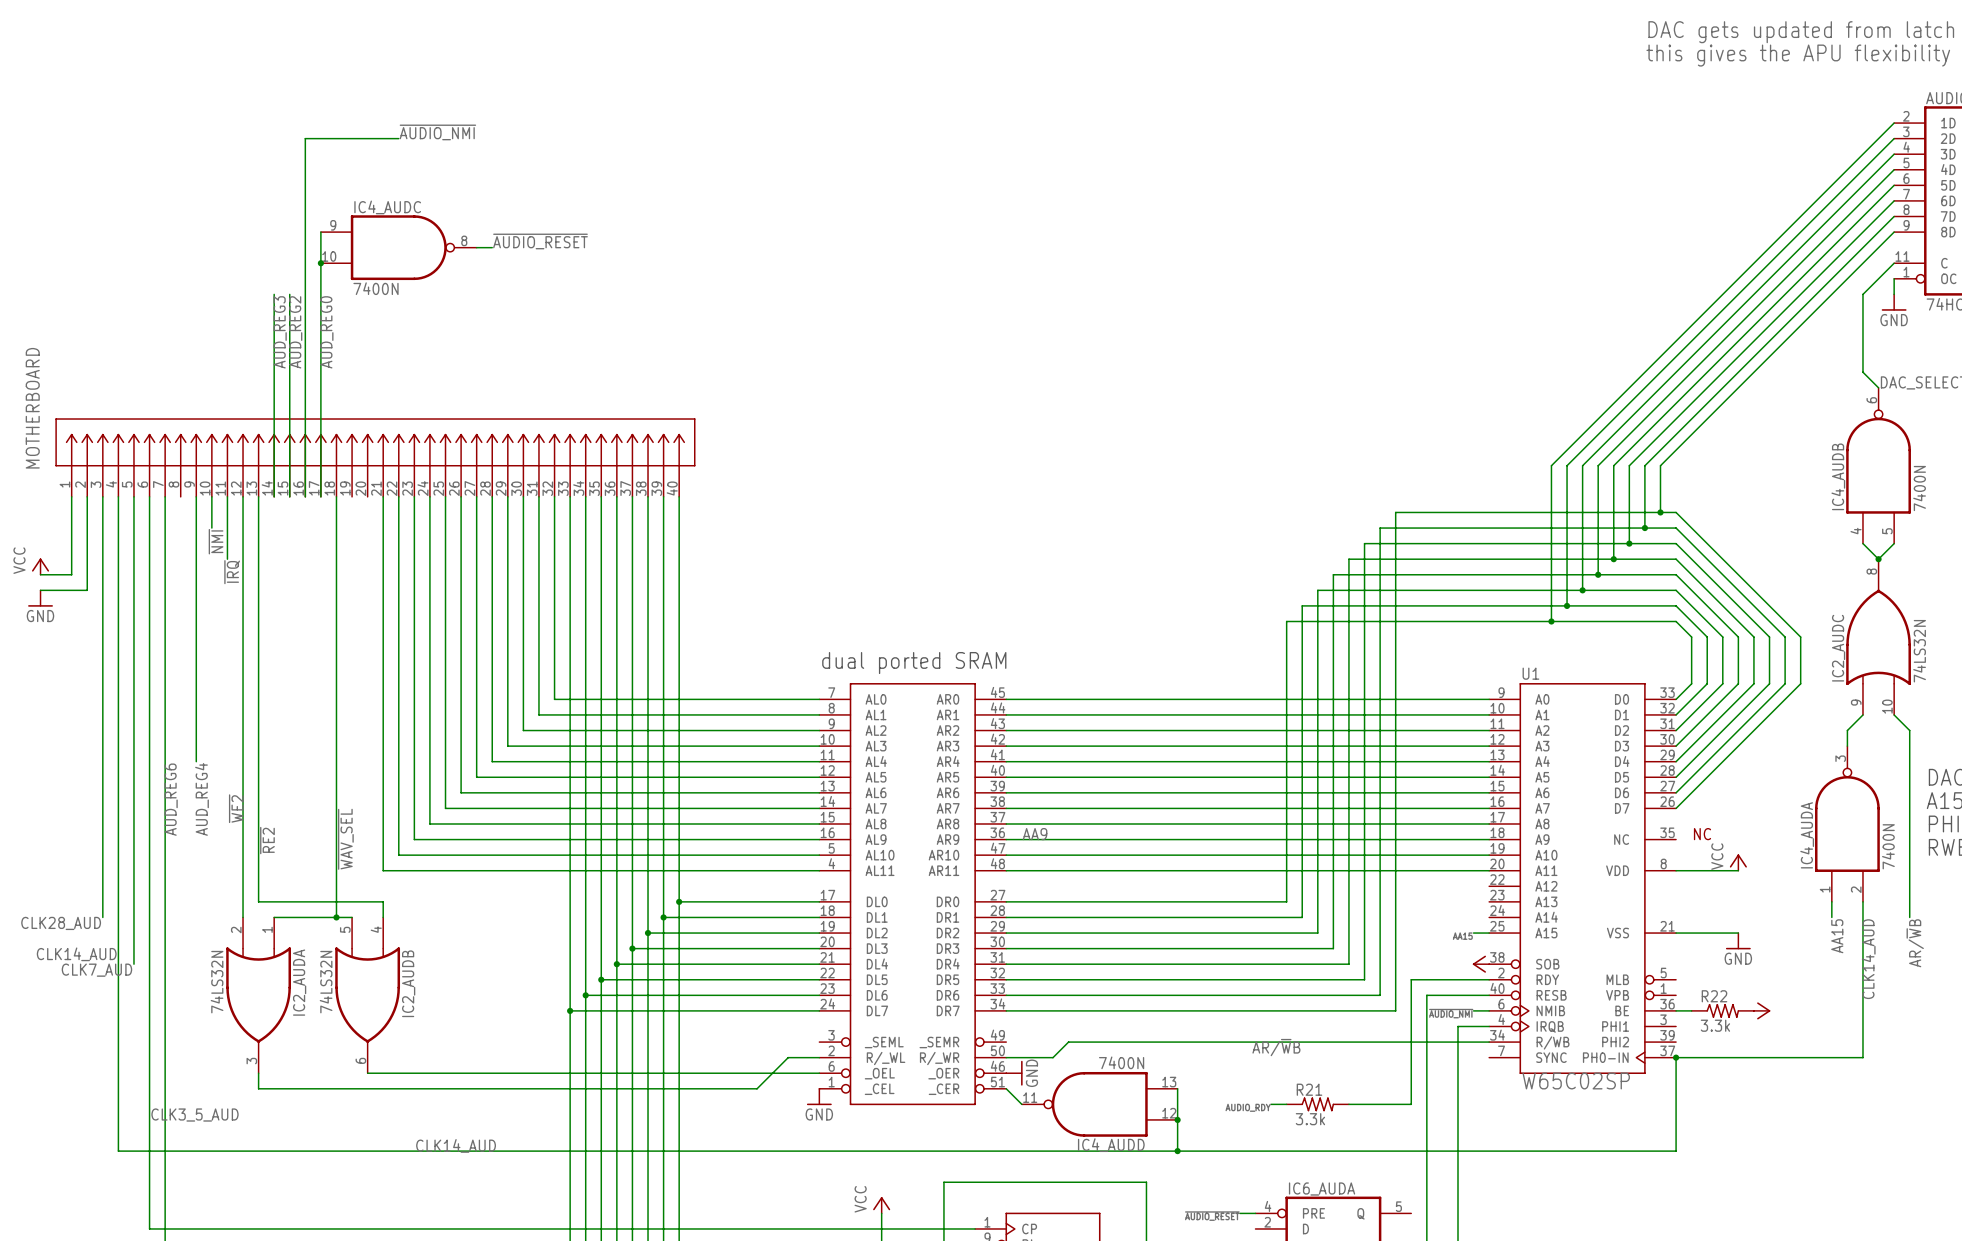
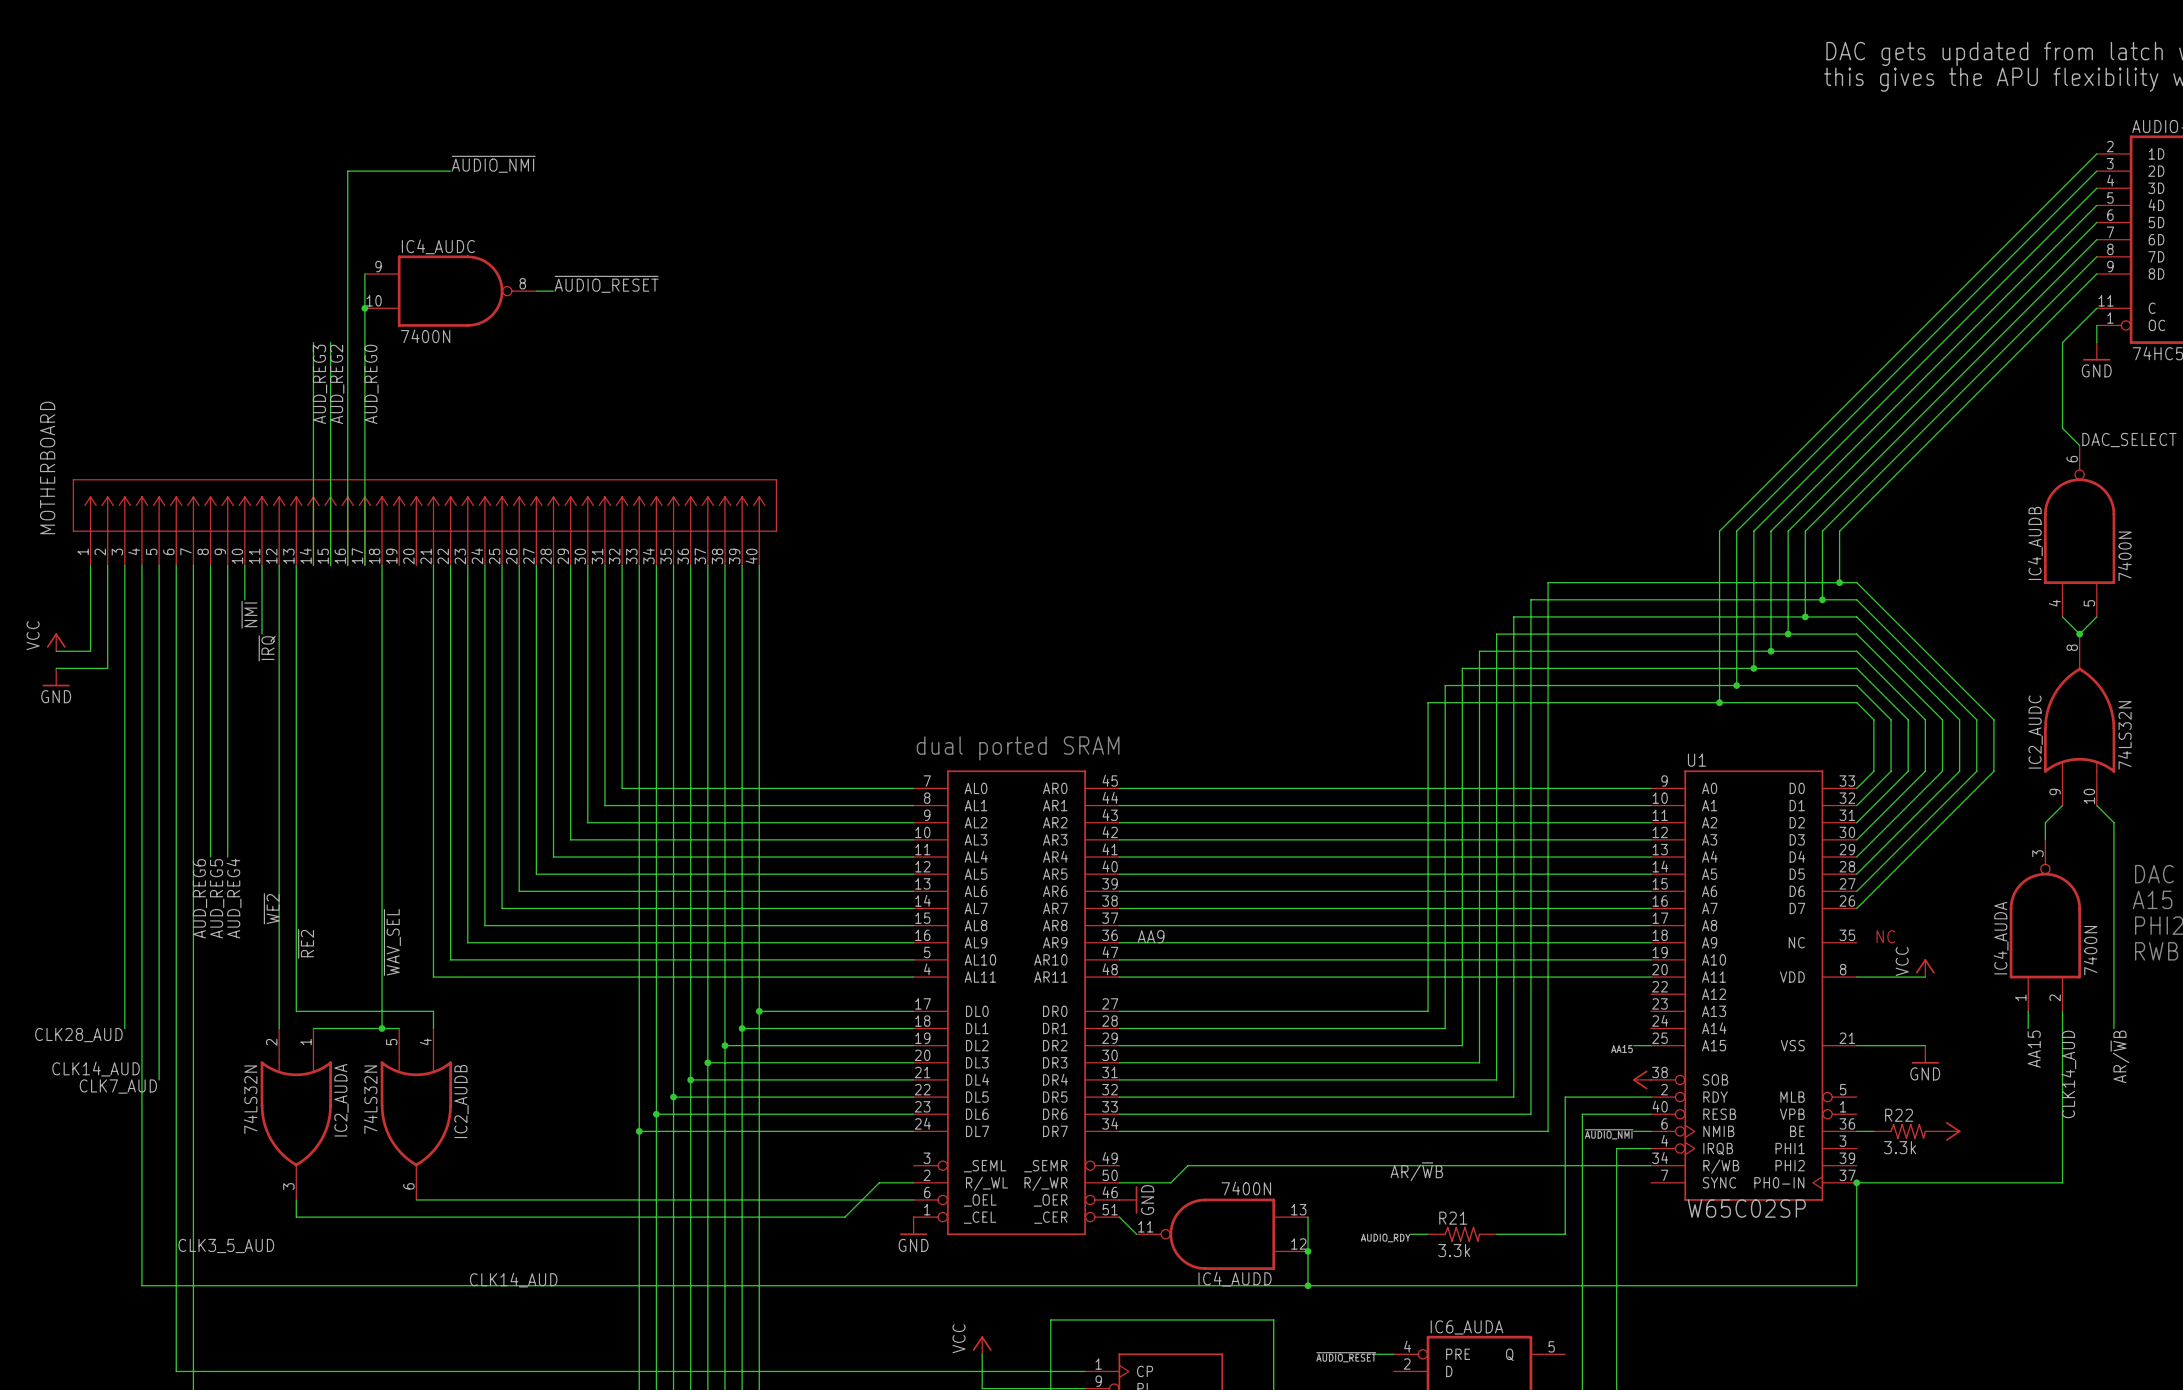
wire: none -> (210, 565) (210, 857)
label: none -> AUD_REG5 (217, 898)

